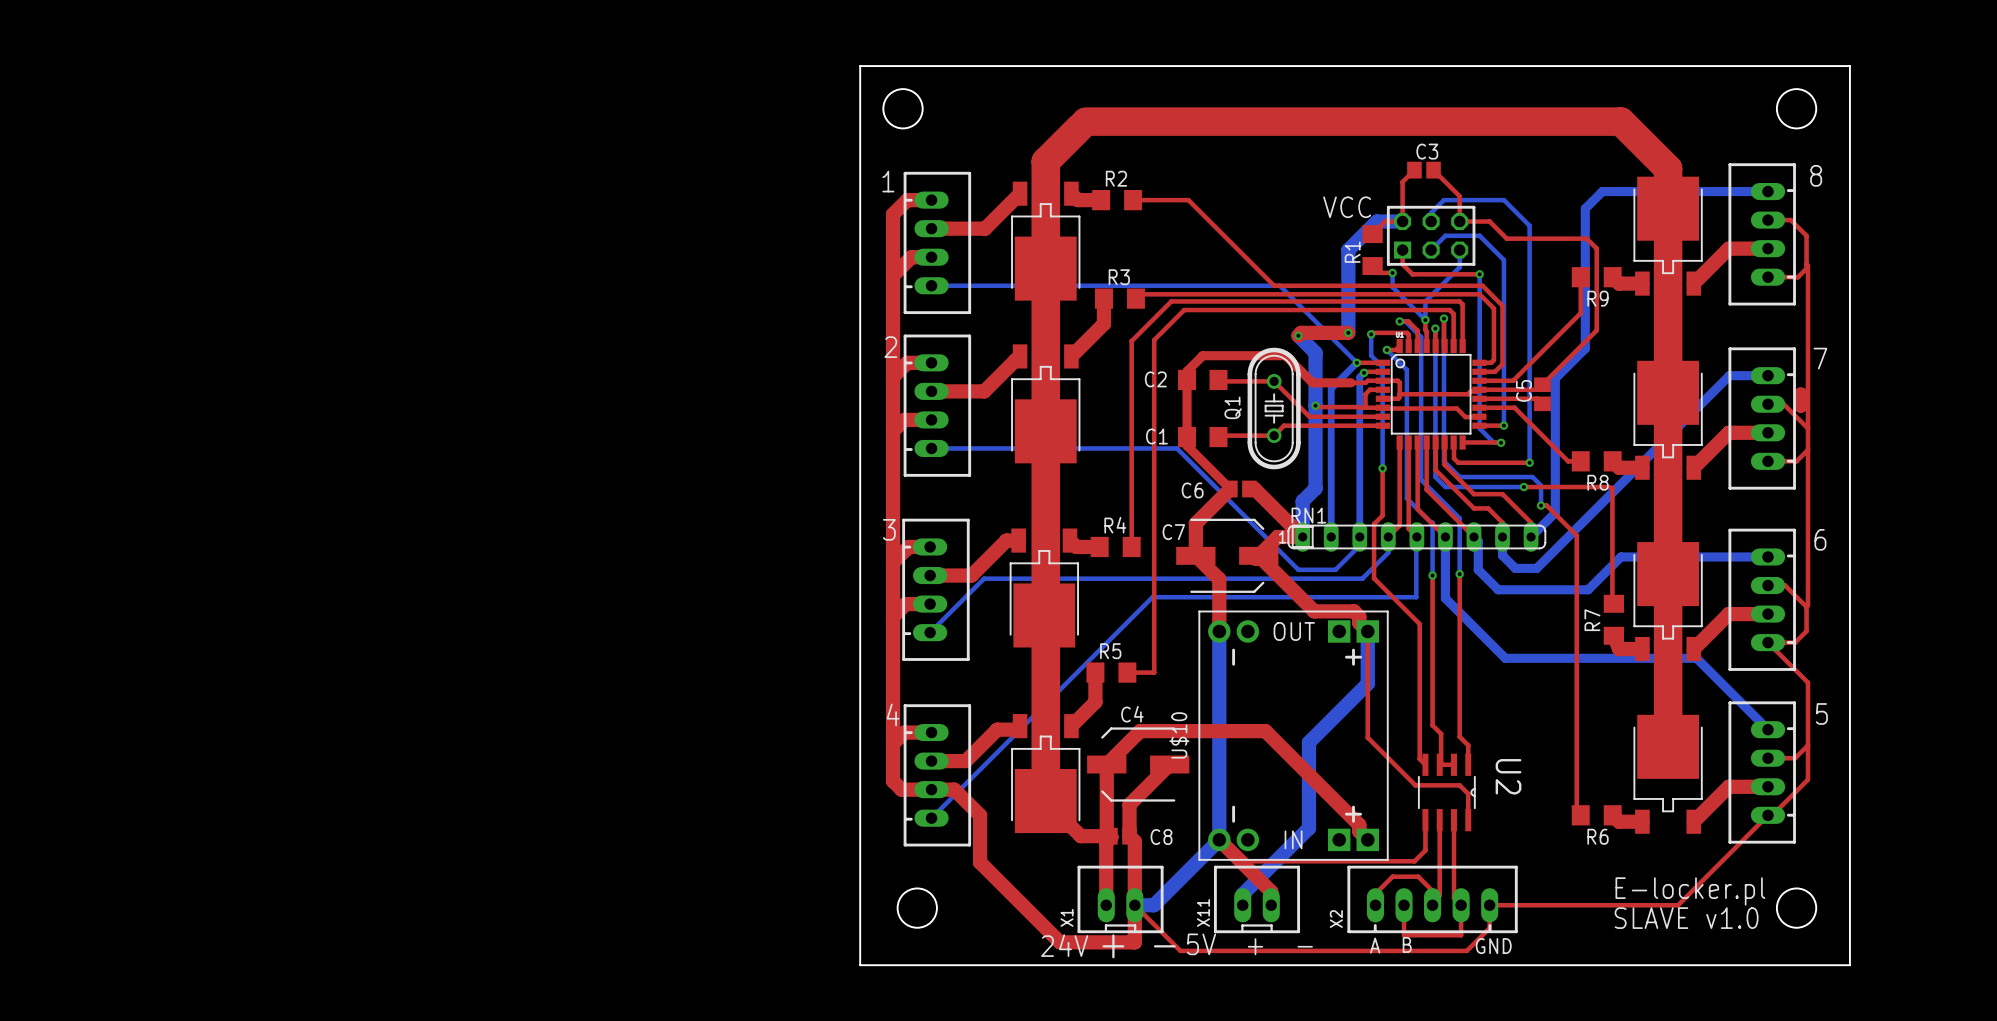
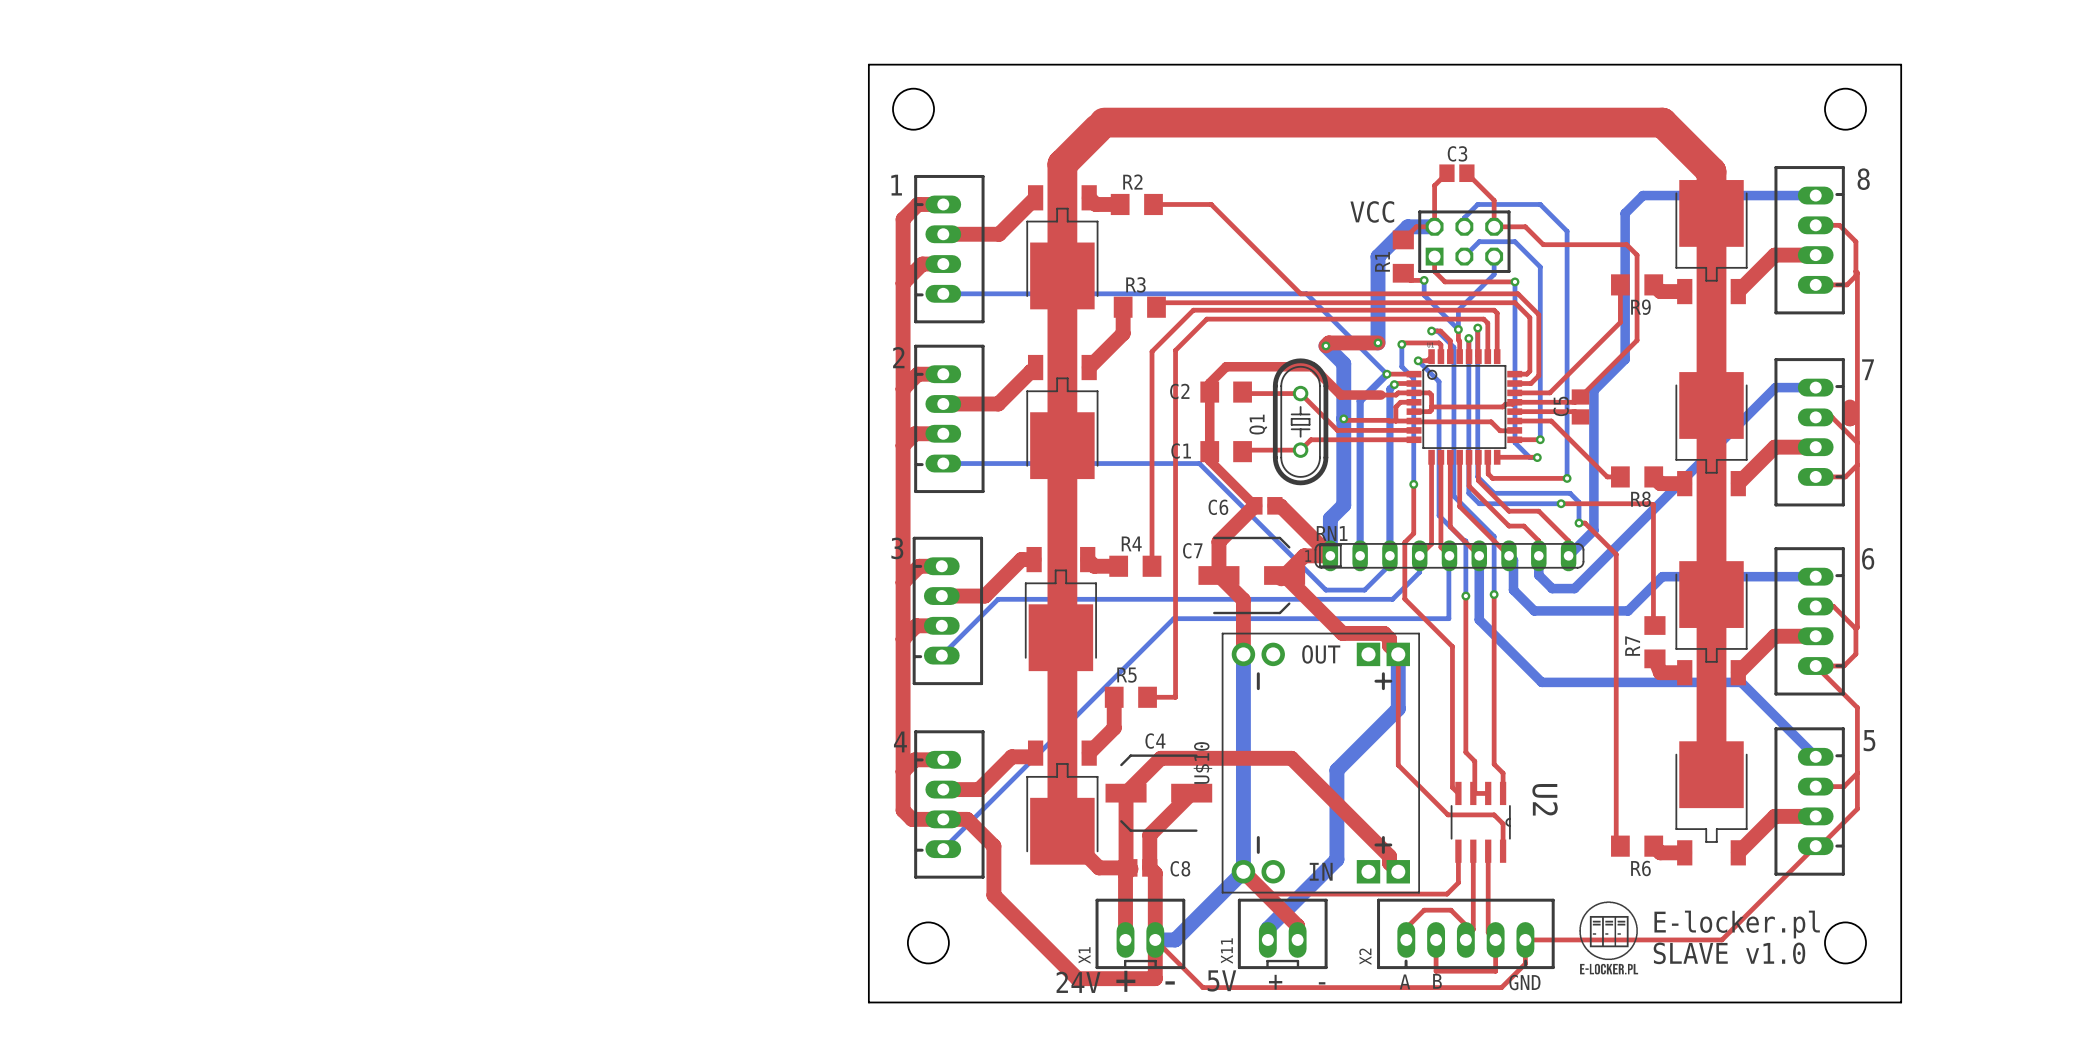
drawing: none -> [1579, 901, 1639, 975]

